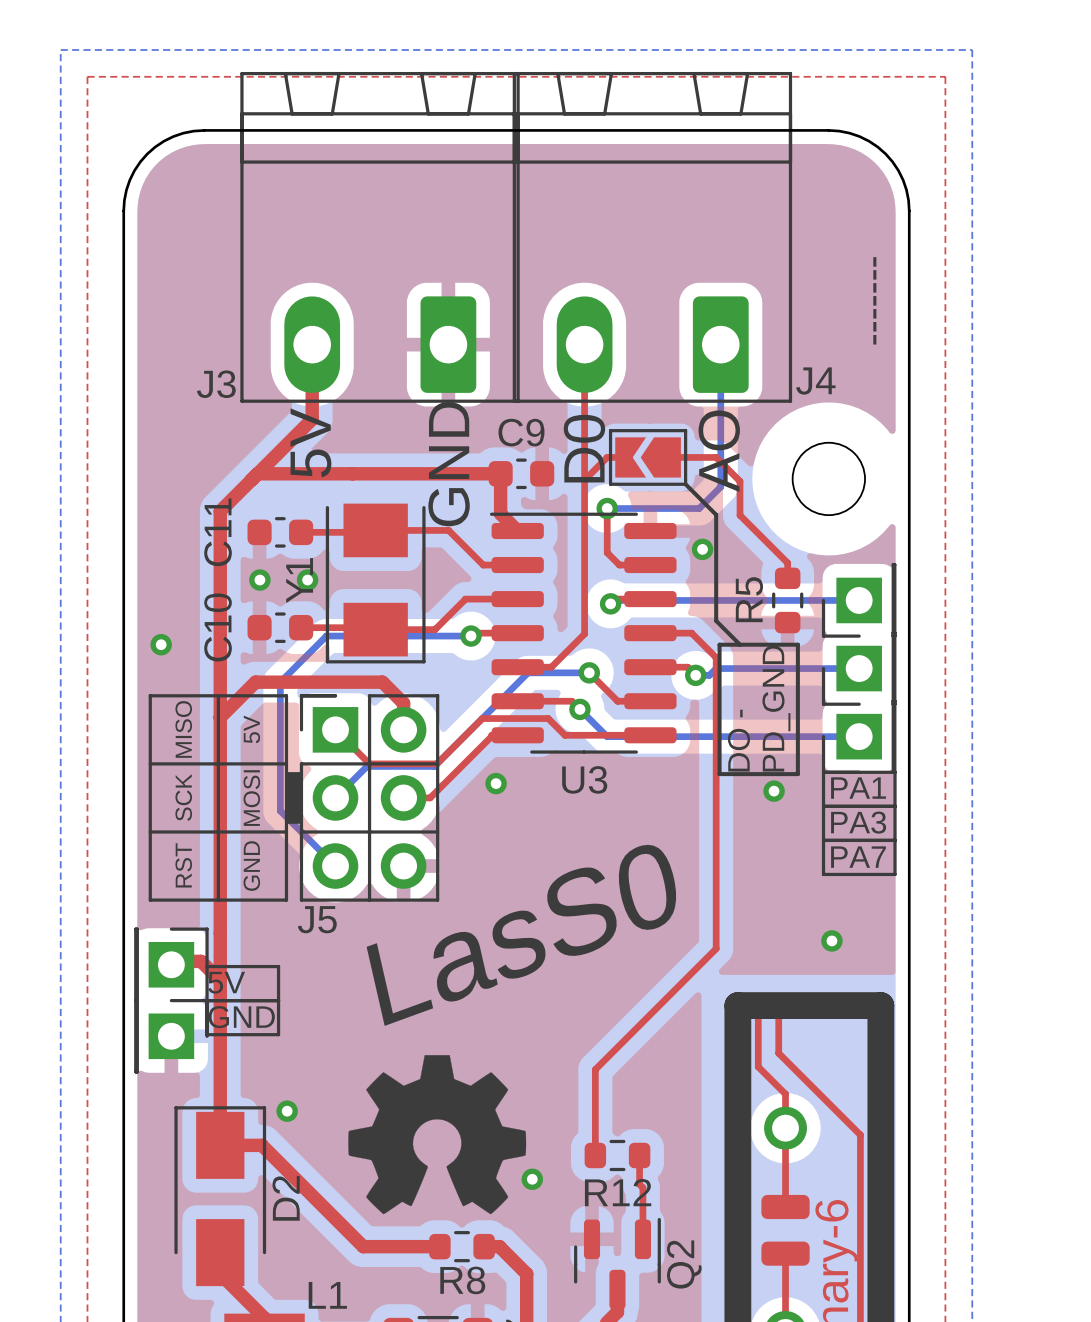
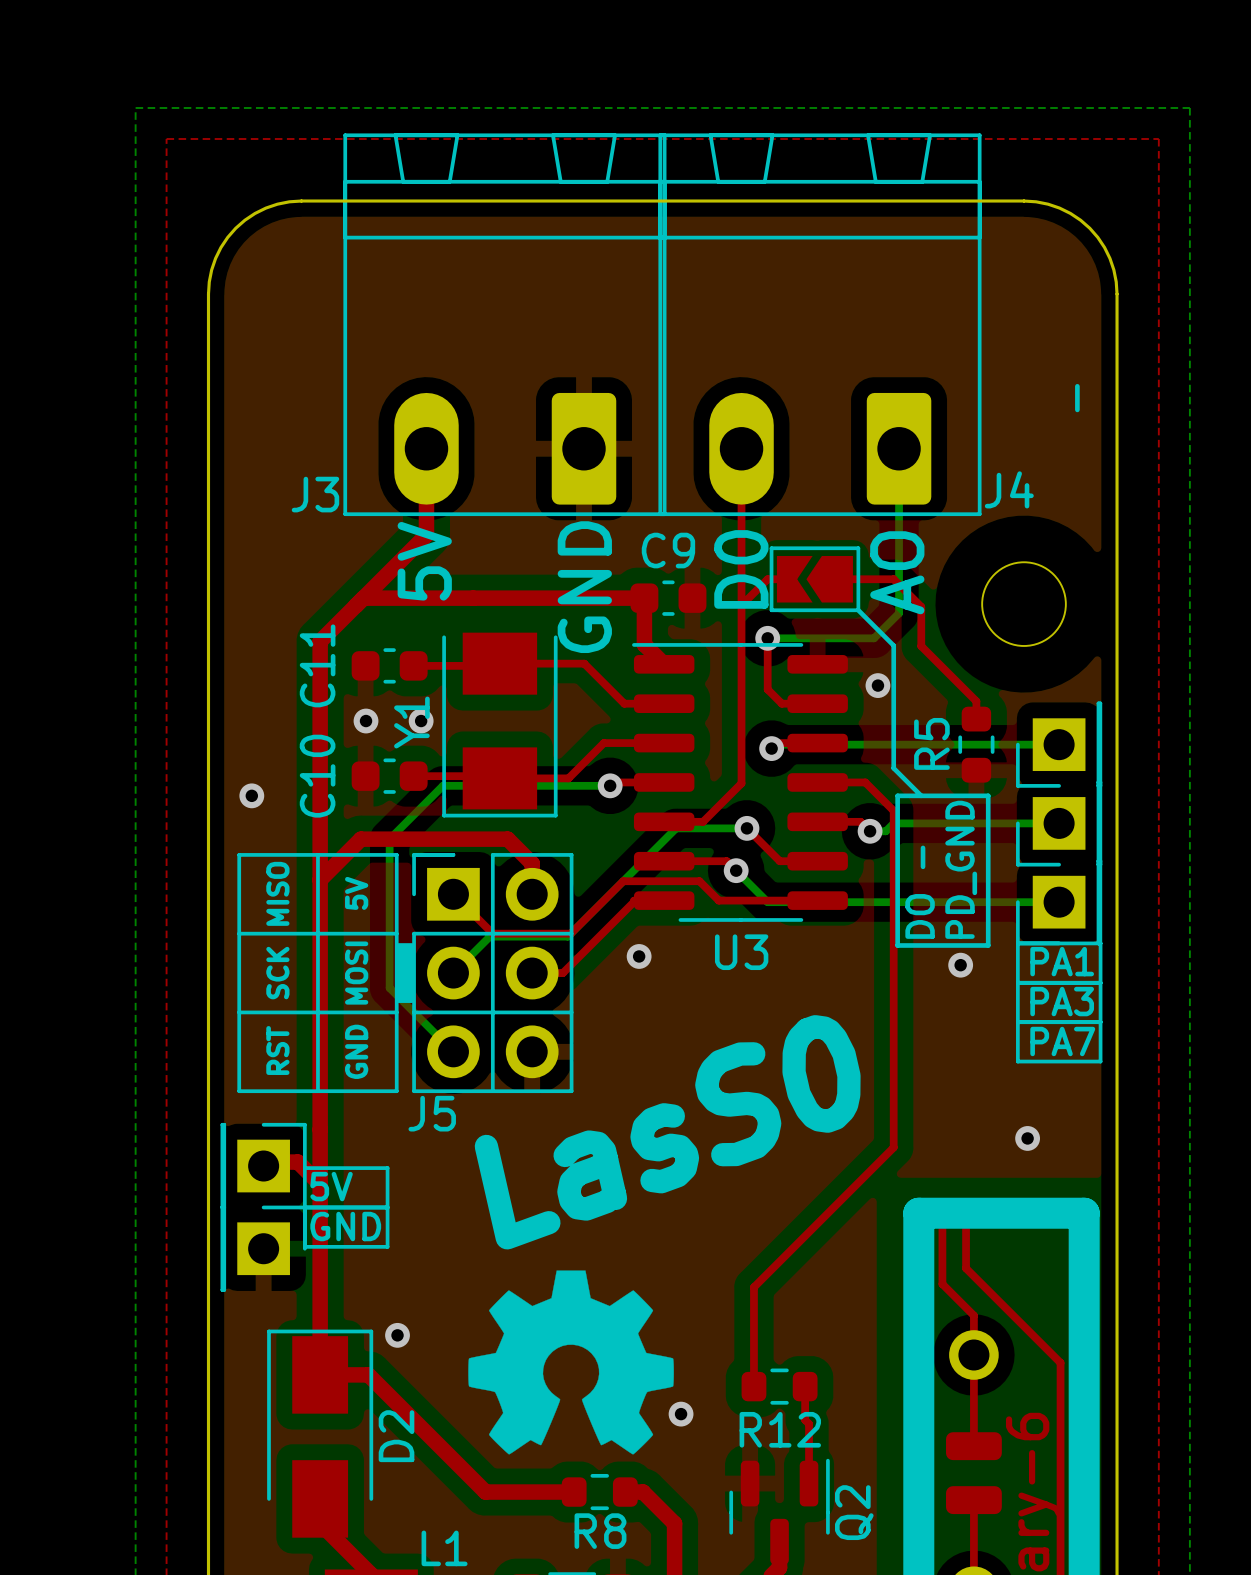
text: ------- (874, 300) -> - (1077, 398)

